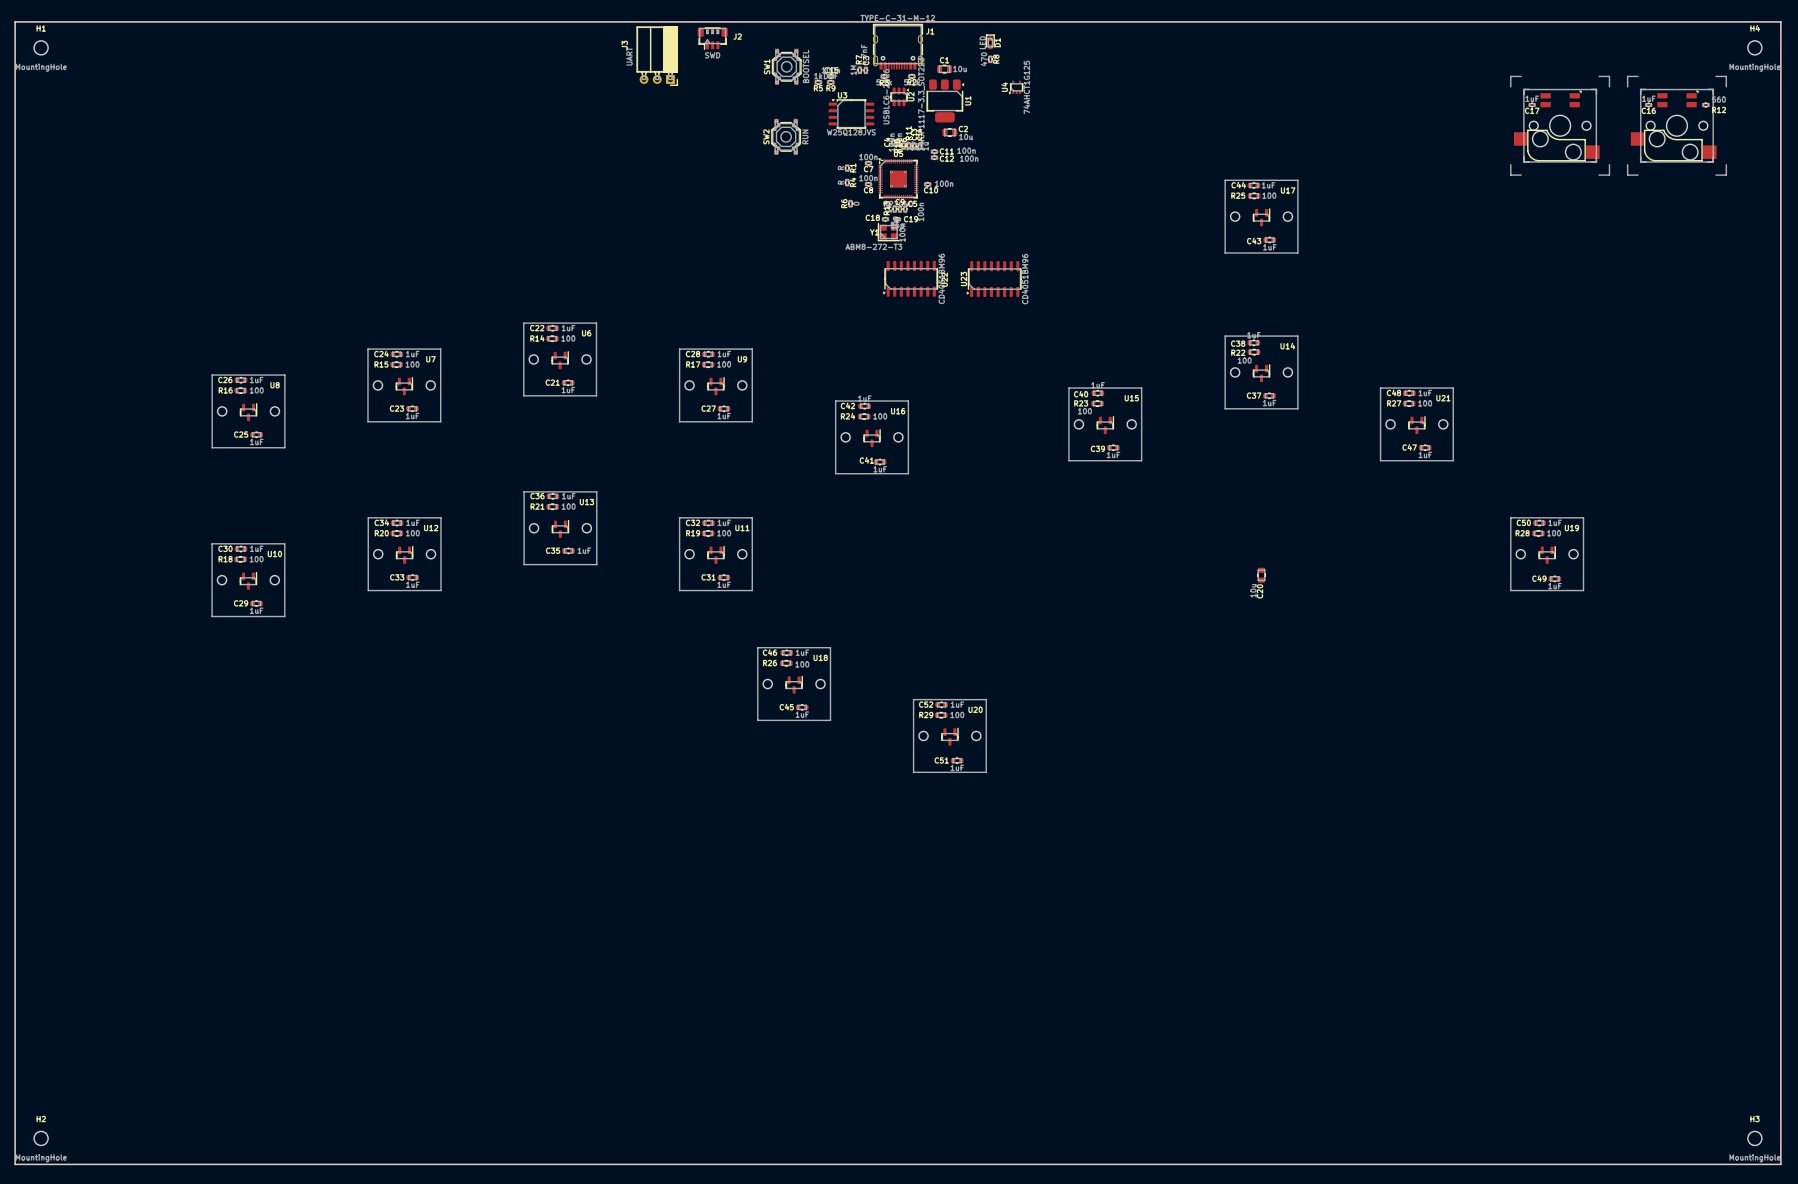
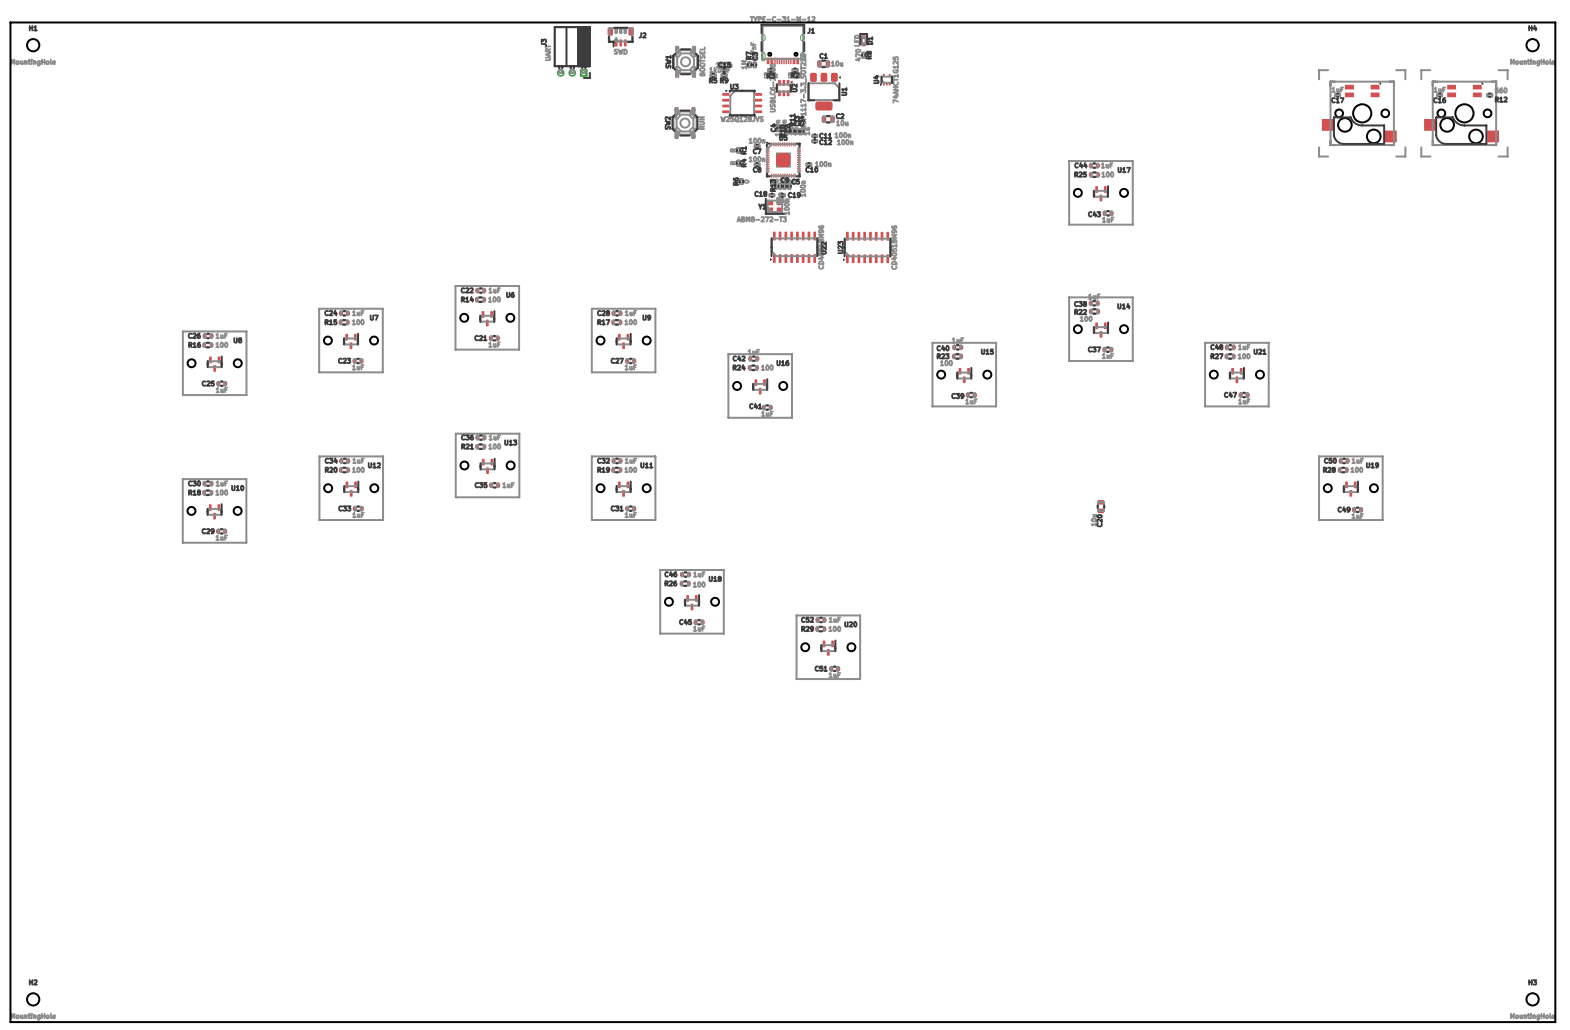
top track: (15, 21) (1780, 21) (1780, 1164) (15, 1164) (15, 21) -> none

